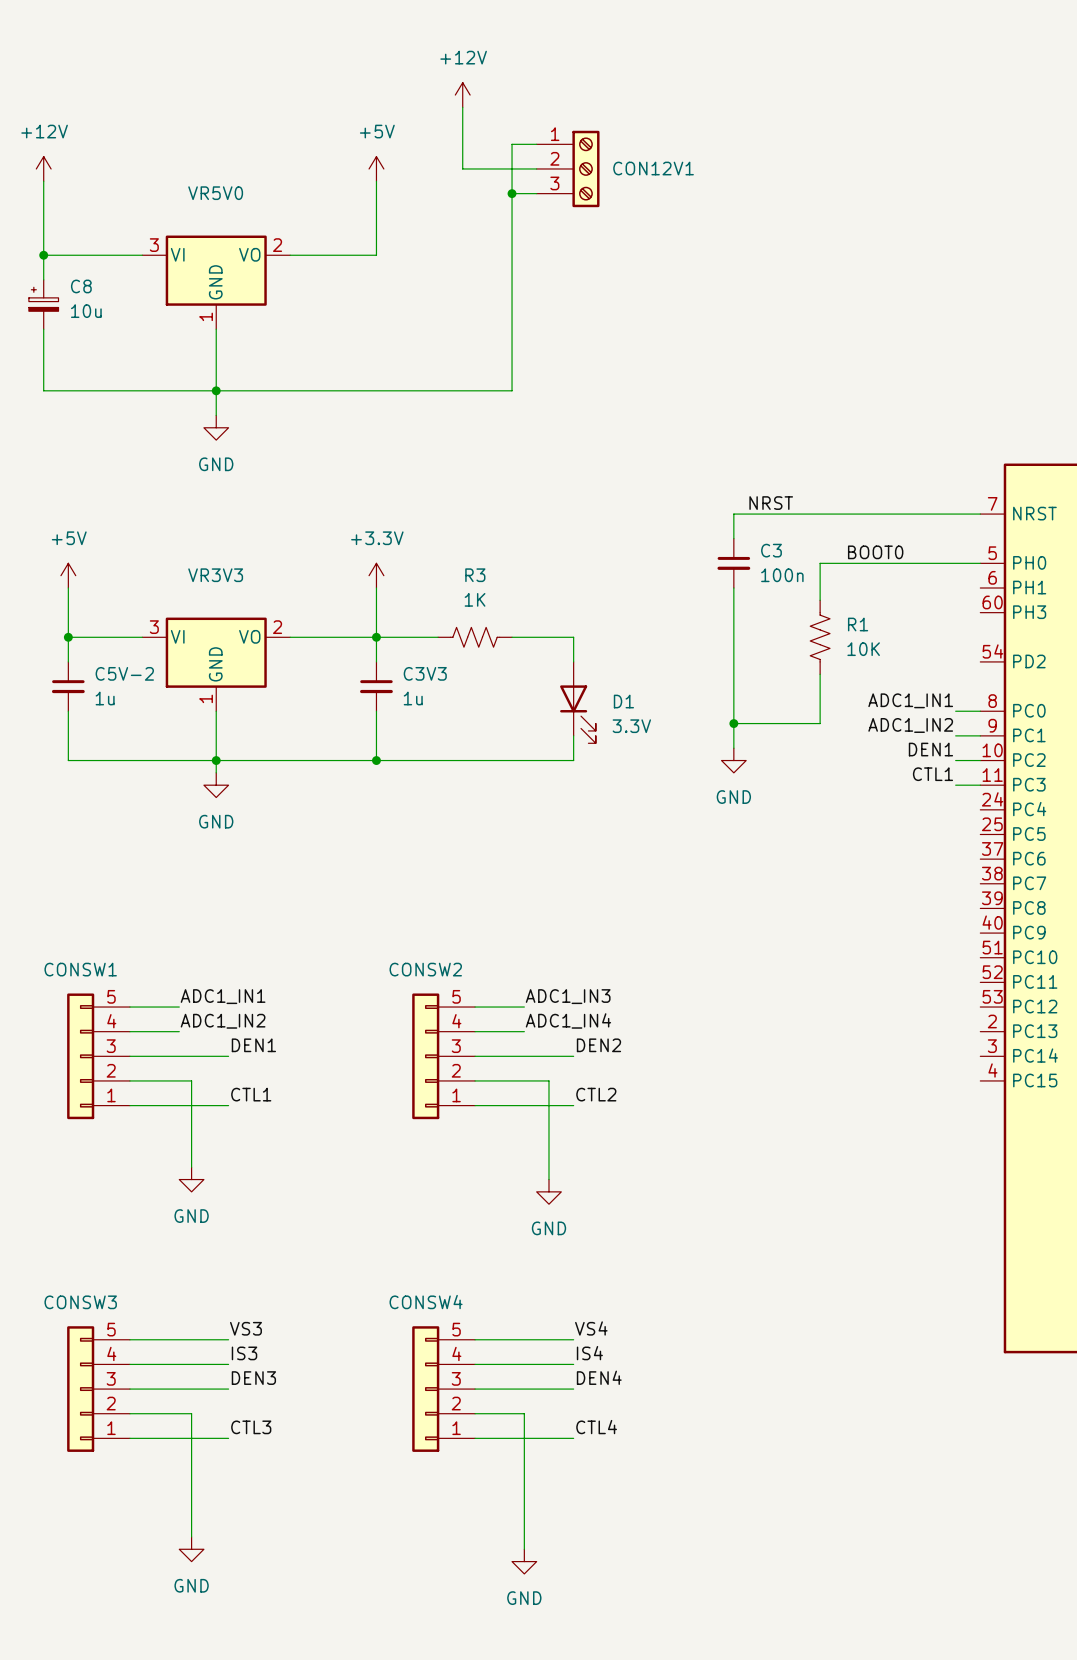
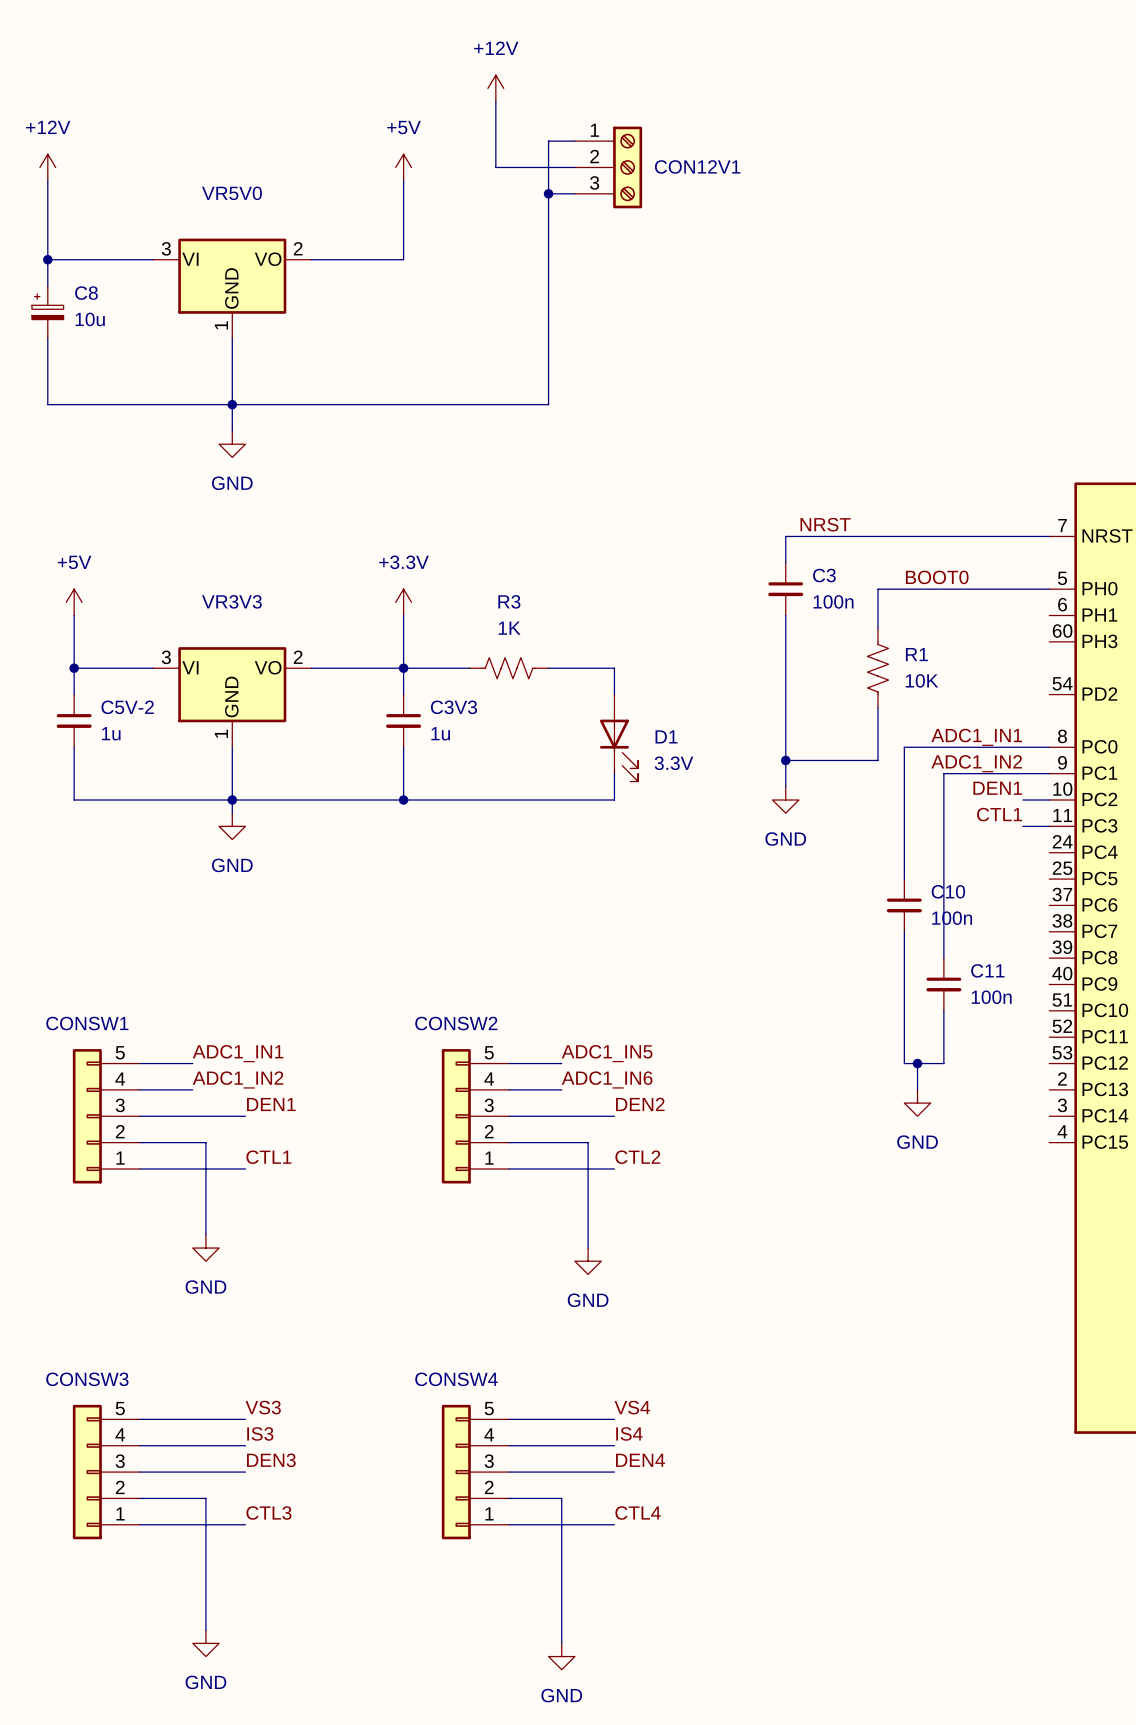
wire: none -> (1022, 747) (904, 747) (904, 879)
wire: none -> (1022, 773) (943, 773) (943, 958)
C10: none -> 100n (904, 905)
wire: none -> (904, 931) (904, 1063) (943, 1063) (943, 1010)
C11: none -> 100n (943, 984)
label: ADC1_IN3 (568, 996) -> ADC1_IN5 (607, 1053)
wire: none -> (917, 1063) (917, 1089)
junction: none -> (917, 1063)
label: ADC1_IN4 (568, 1020) -> ADC1_IN6 (607, 1079)
power symbol: none -> GND (917, 1103)

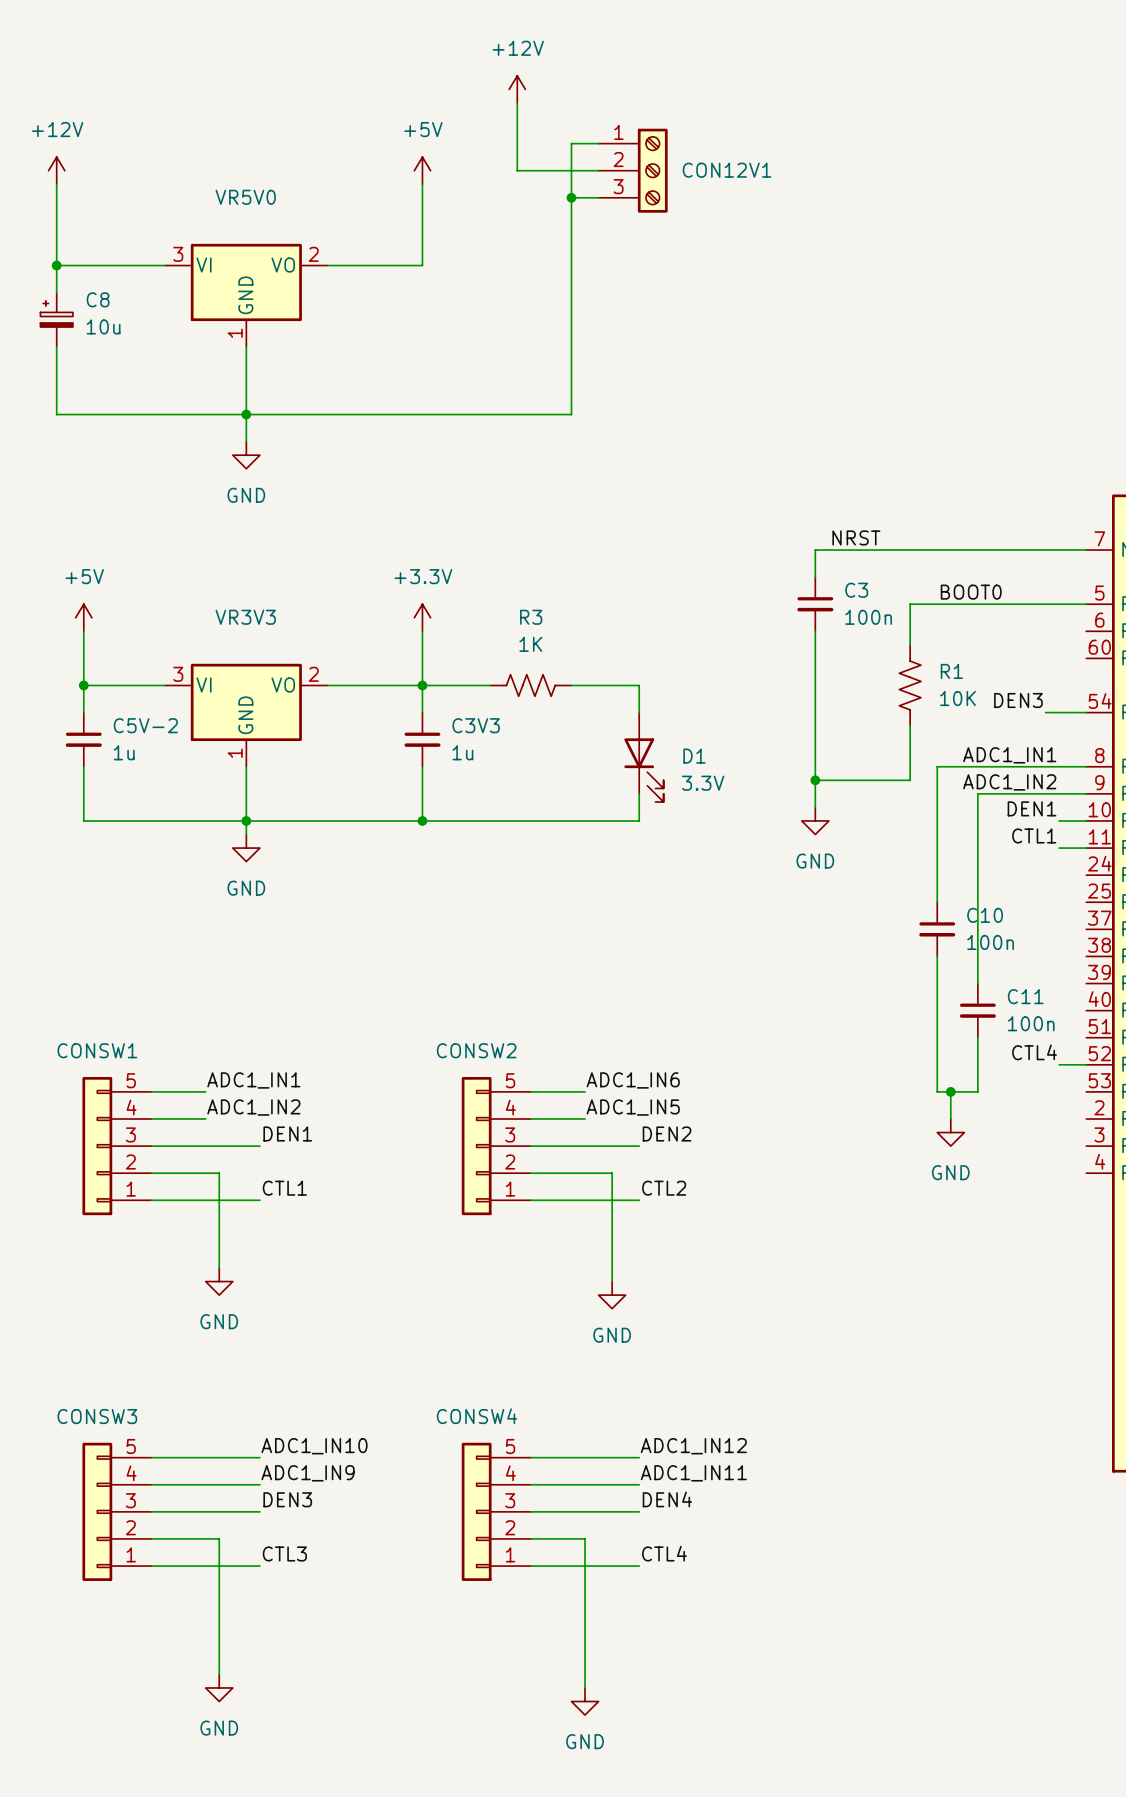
label: none -> DEN3 (1018, 700)
wire: none -> (1045, 712) (1086, 712)
label: none -> CTL4 (1034, 1052)
wire: none -> (1059, 1064) (1086, 1064)
label: ADC1_IN5 (607, 1053) -> ADC1_IN6 (633, 1080)
label: ADC1_IN6 (607, 1079) -> ADC1_IN5 (633, 1107)
label: VS3 (263, 1407) -> ADC1_IN10 (314, 1446)
label: VS4 (632, 1407) -> ADC1_IN12 (693, 1446)
label: IS3 (260, 1433) -> ADC1_IN9 (308, 1473)
label: IS4 (629, 1433) -> ADC1_IN11 (693, 1473)

